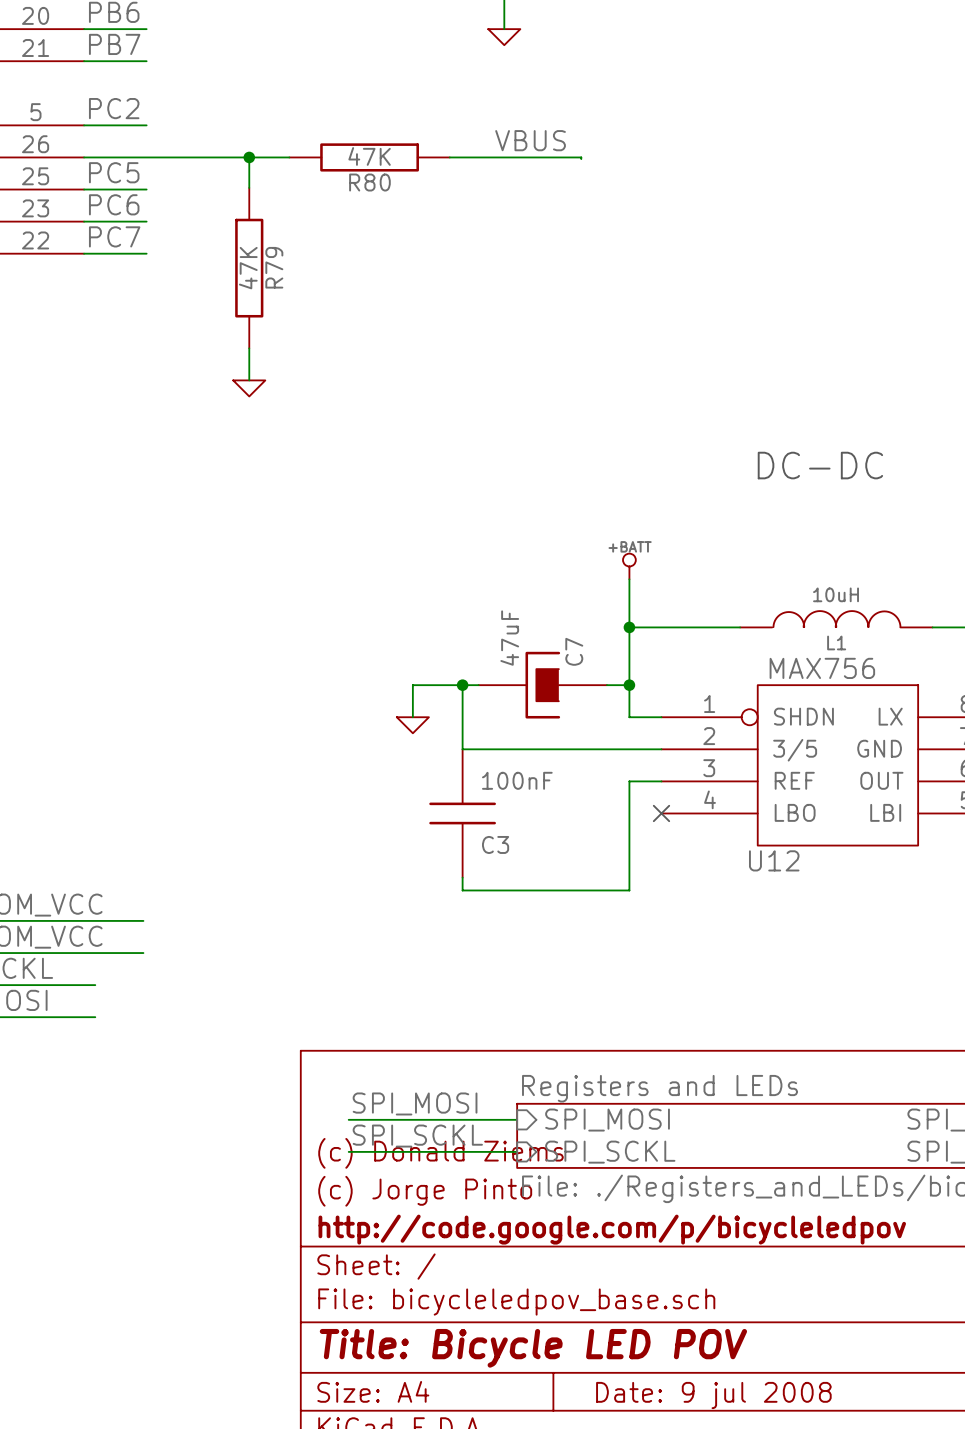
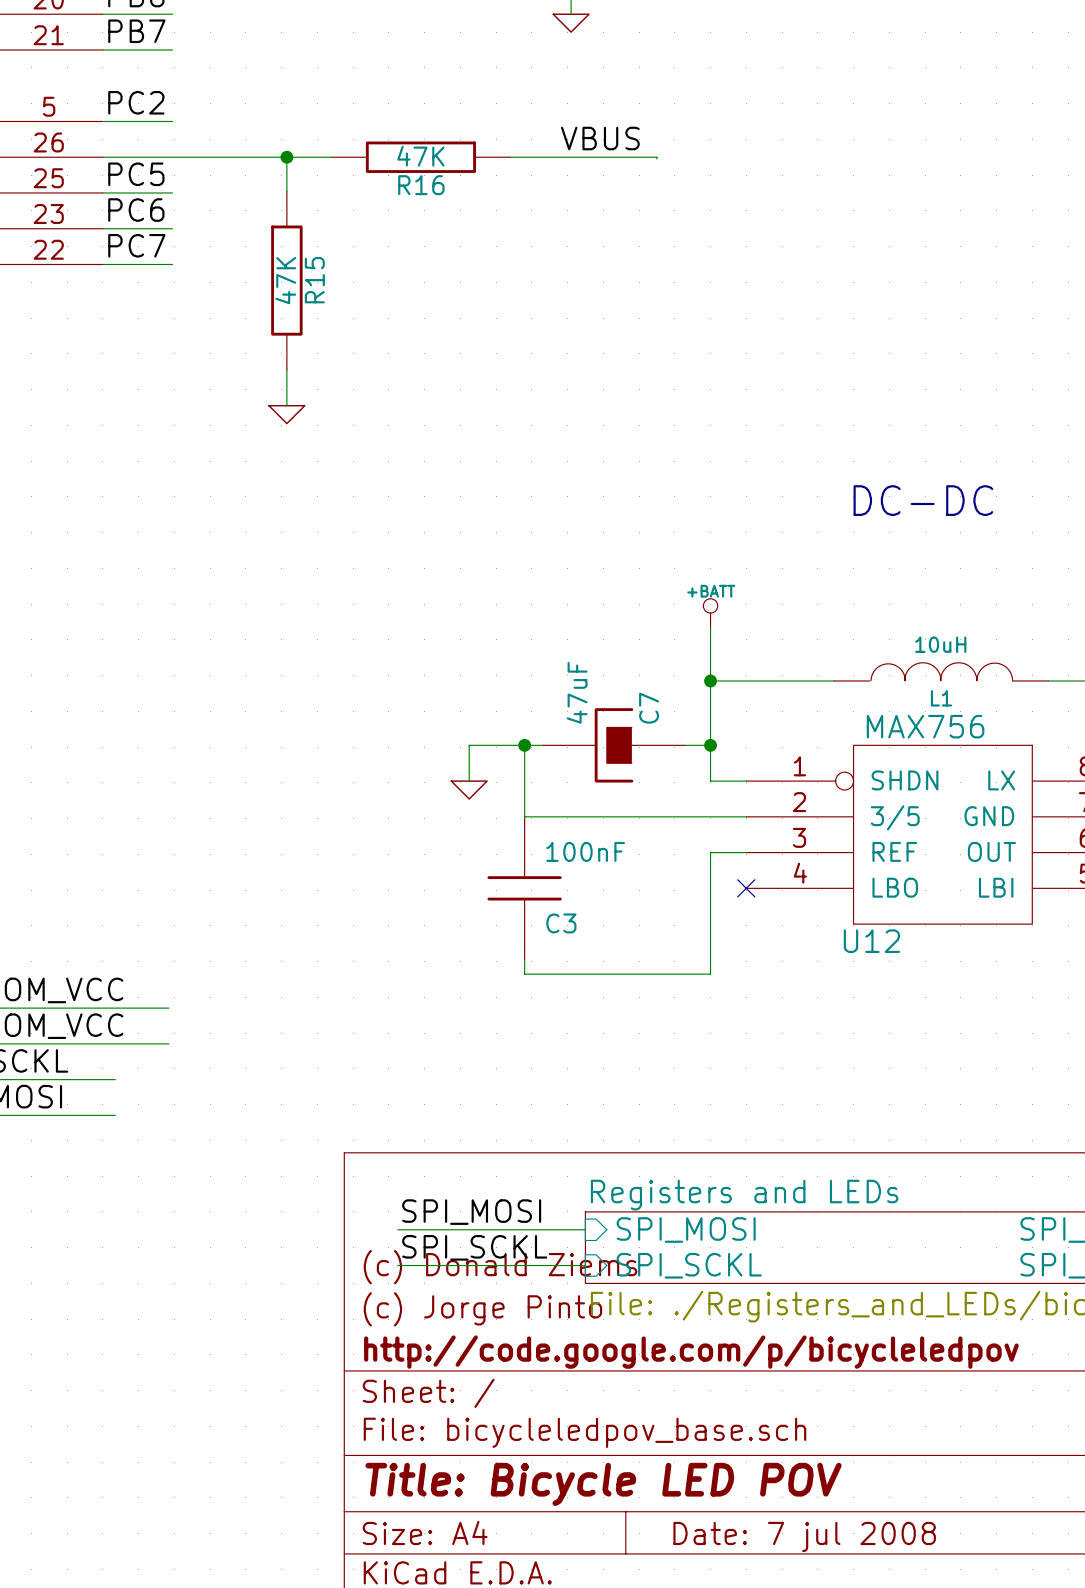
R80 name: R80 (369, 182) -> R16 (421, 185)
R79 name: R79 (274, 267) -> R15 (314, 280)
title block: Date: 9 jul 2008 (713, 1395) -> Date: 7 jul 2008 (804, 1536)

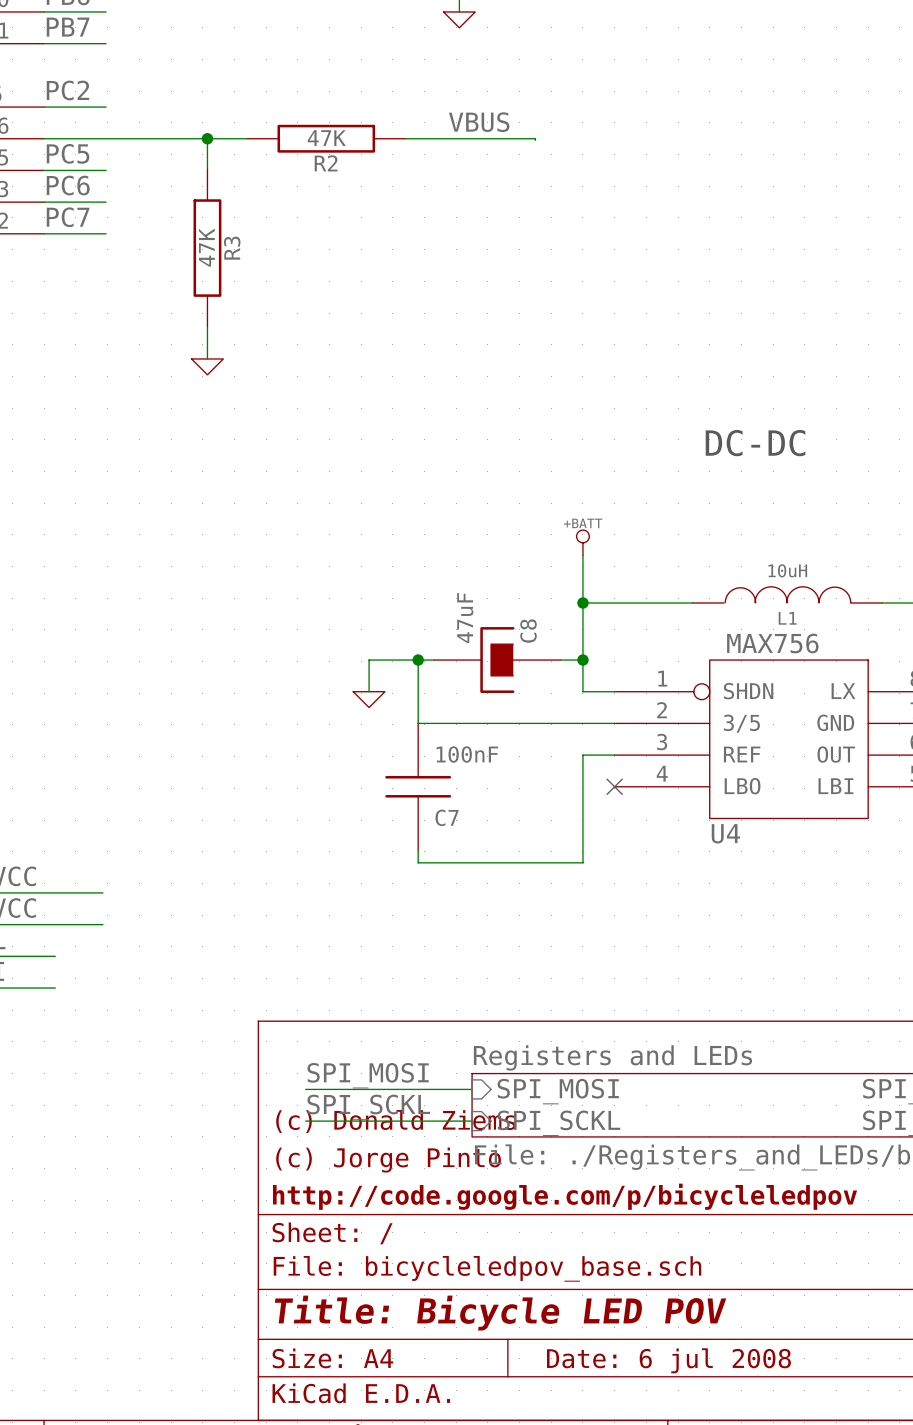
R16 name: R16 (421, 185) -> R2 (326, 163)
R15 name: R15 (314, 280) -> R3 (232, 248)
C7 name: C7 (649, 708) -> C8 (528, 631)
C3 name: C3 (561, 923) -> C7 (447, 817)
U12 name: U12 (871, 941) -> U4 (725, 833)
title block: Date: 7 jul 2008 (804, 1536) -> Date: 6 jul 2008 (668, 1360)

